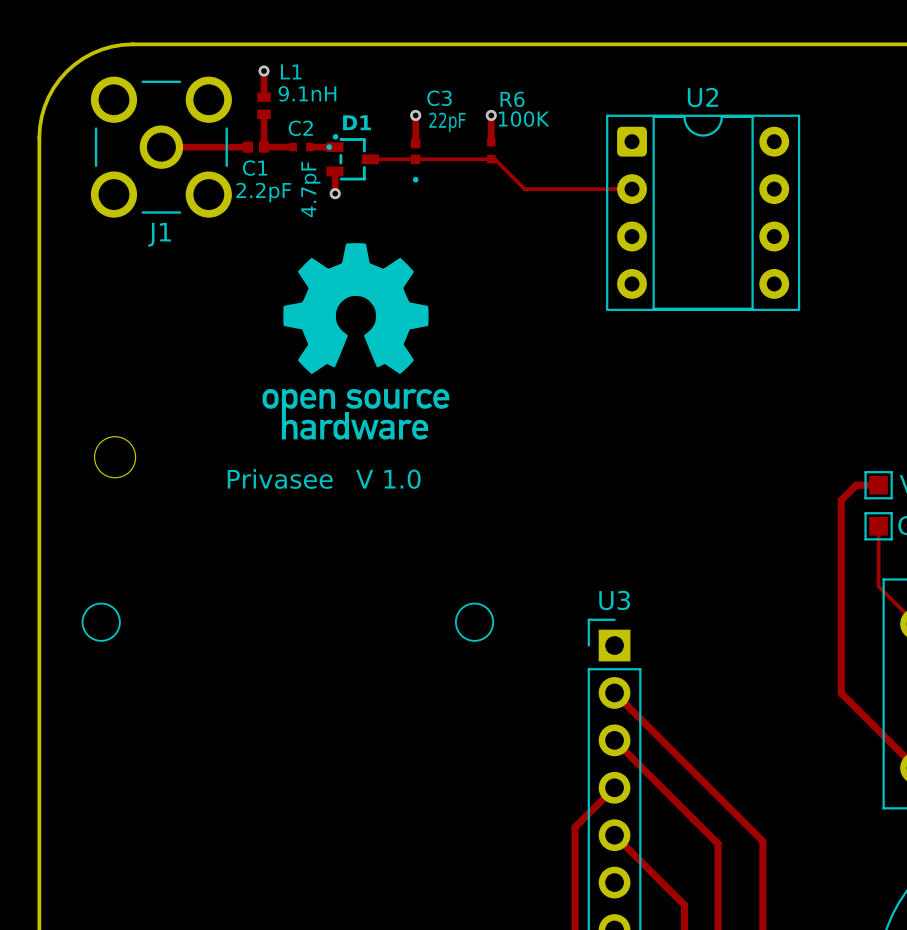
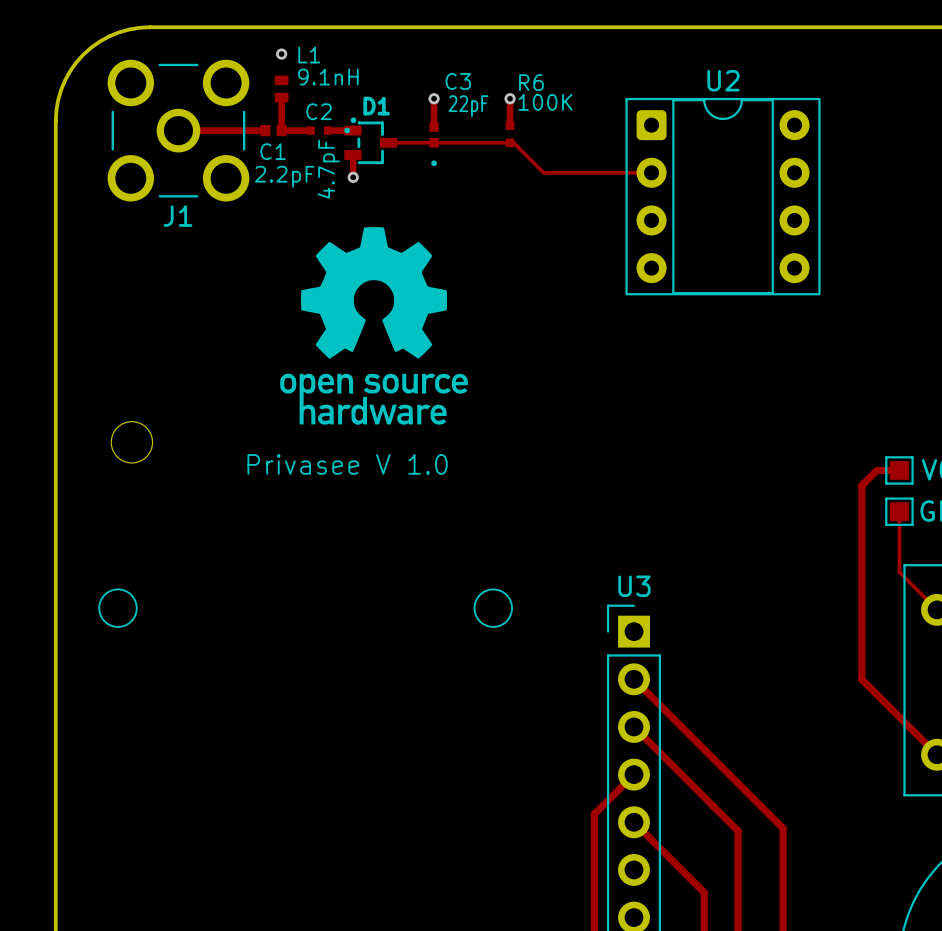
track: (264, 71) (264, 96) -> none

